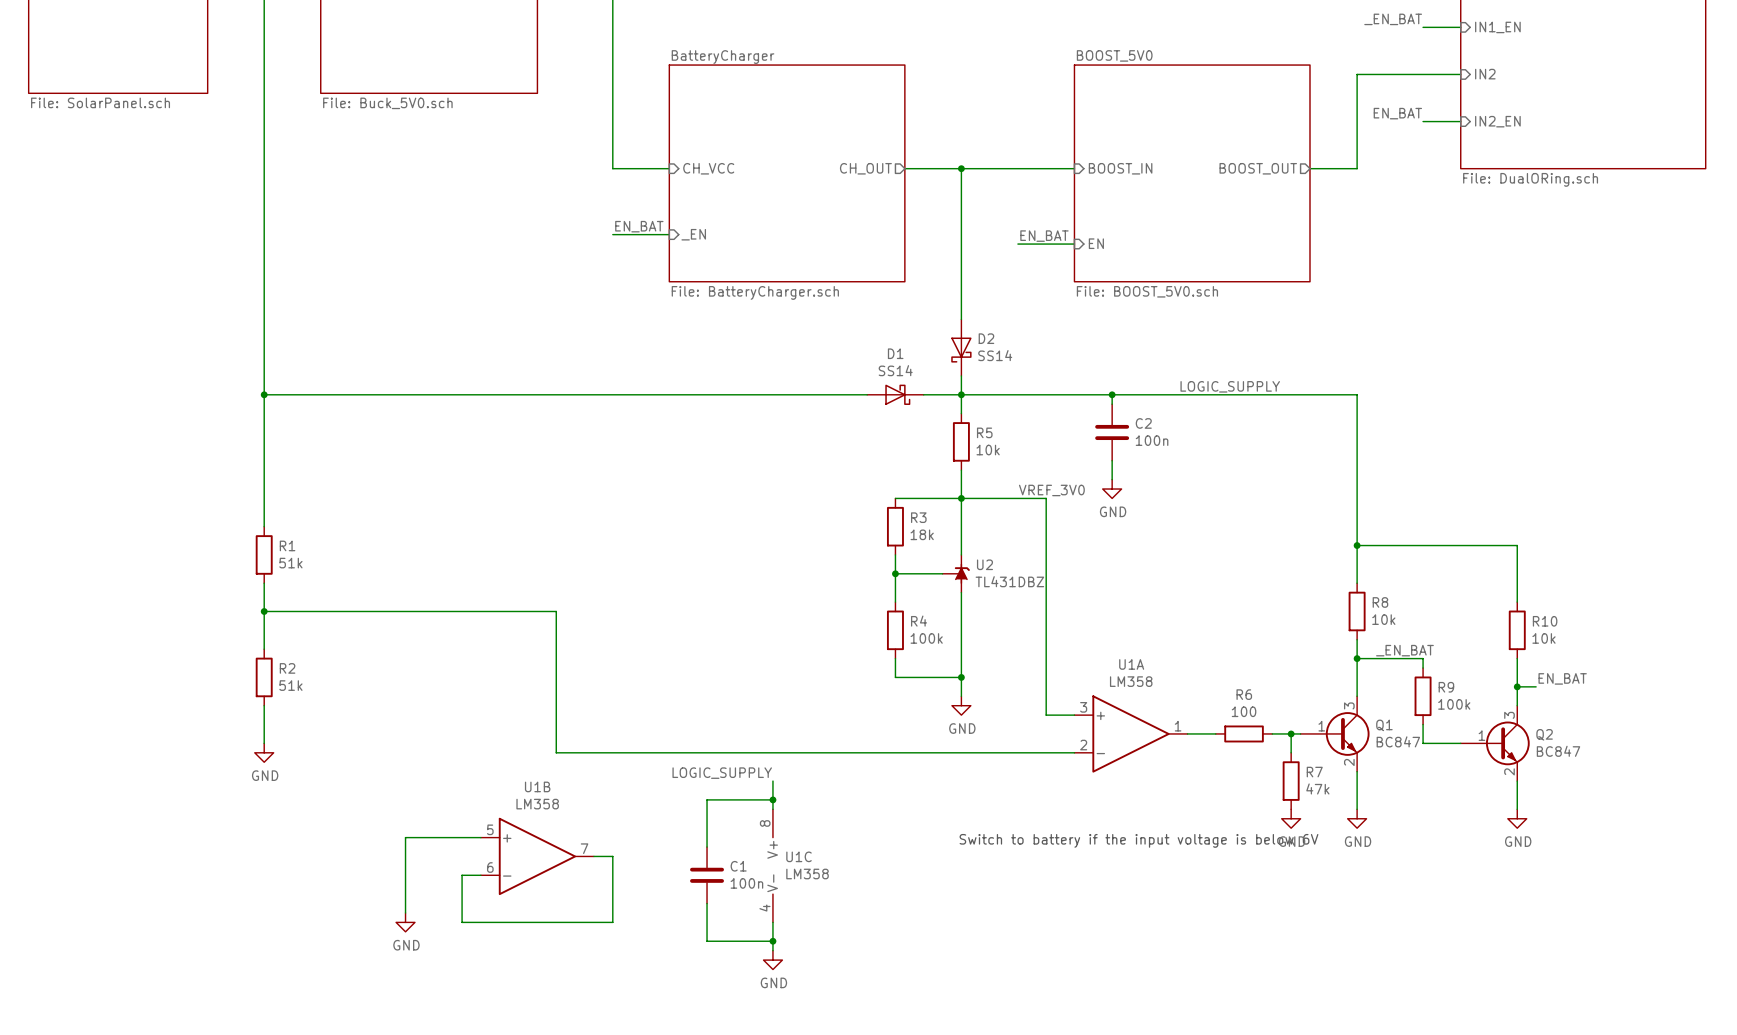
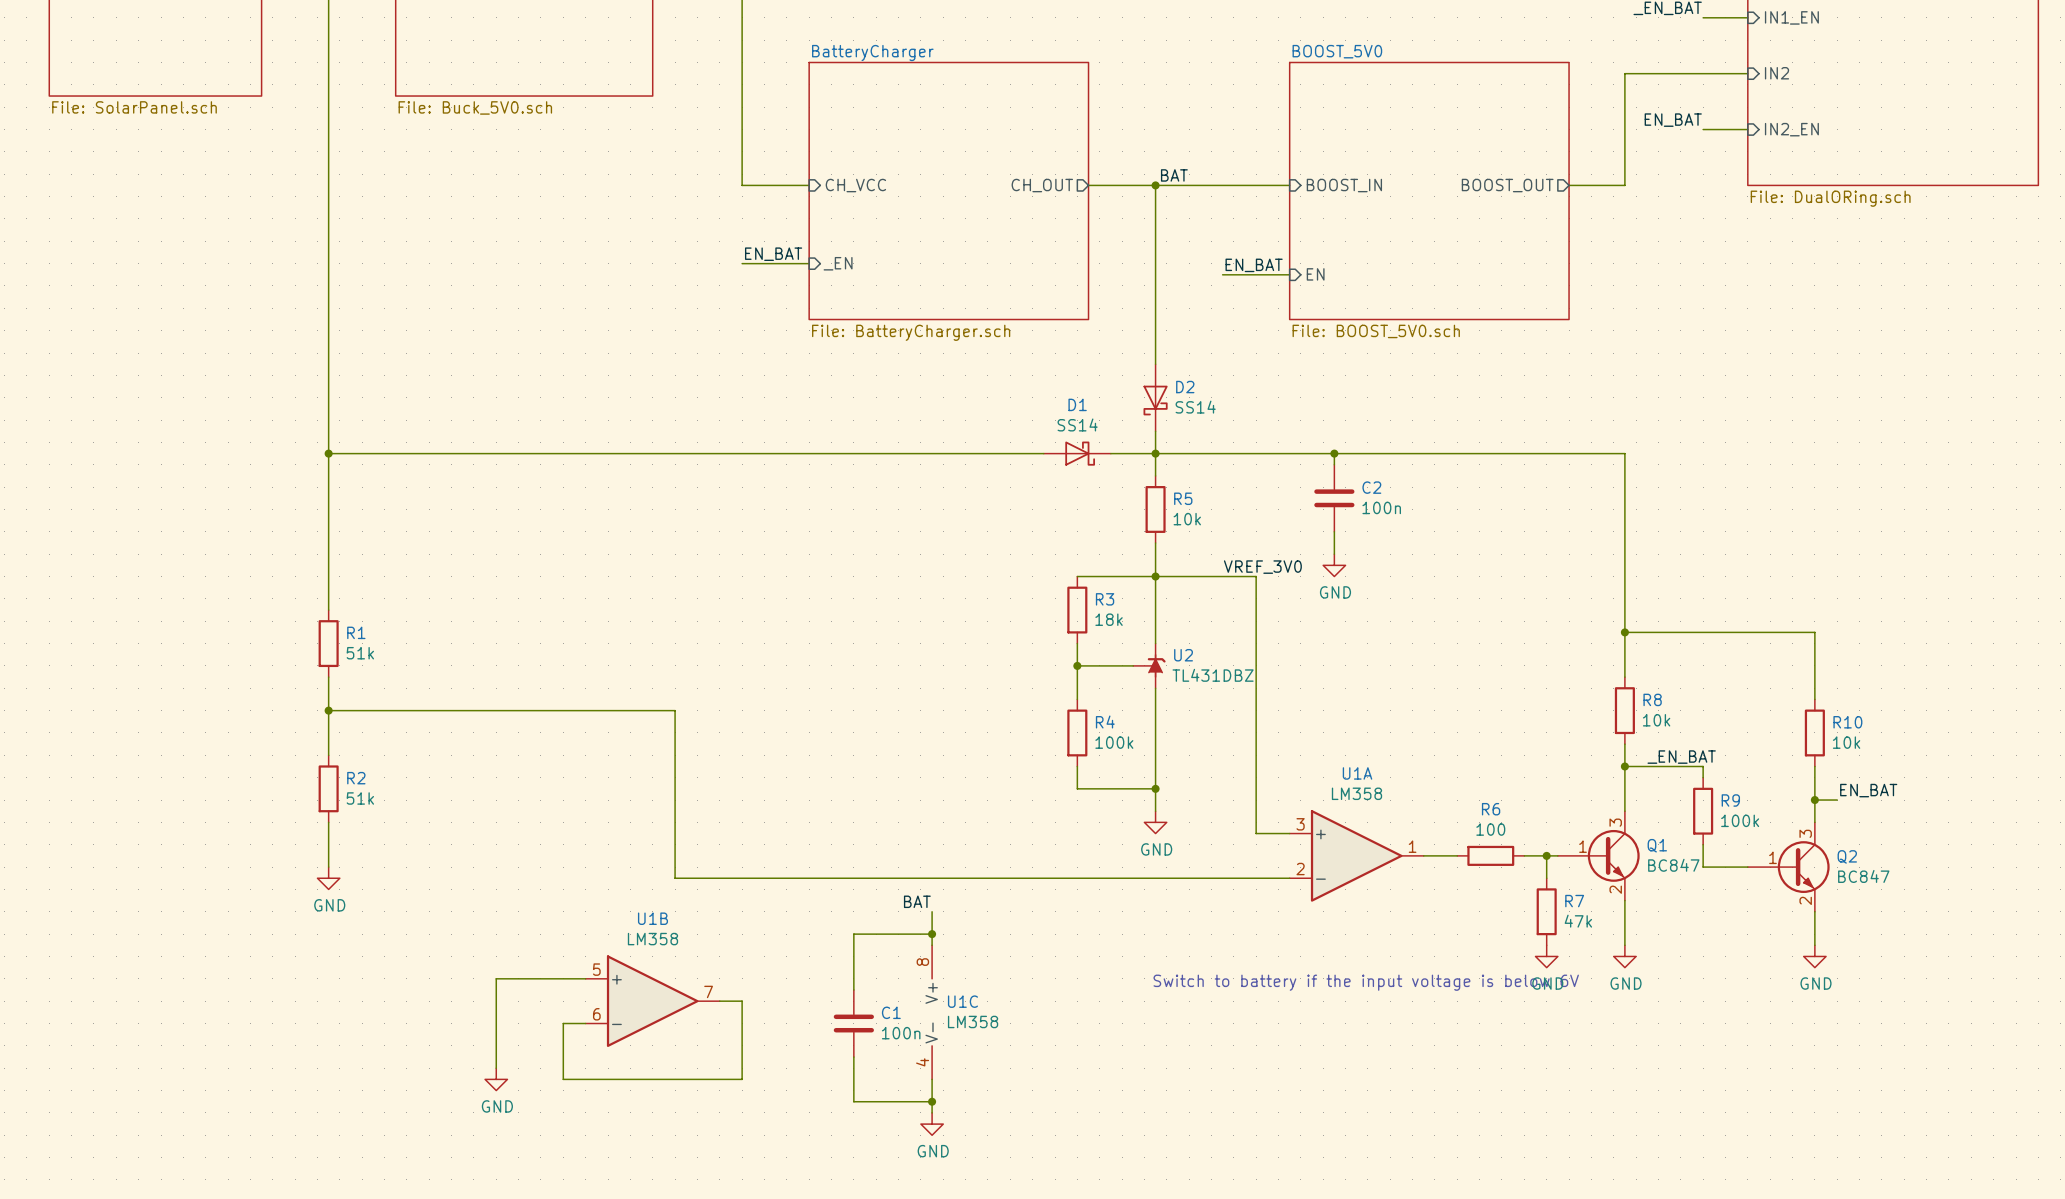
label: none -> BAT (1174, 175)
label: LOGIC_SUPPLY (1230, 386) -> none
label: LOGIC_SUPPLY (722, 773) -> BAT (917, 901)

